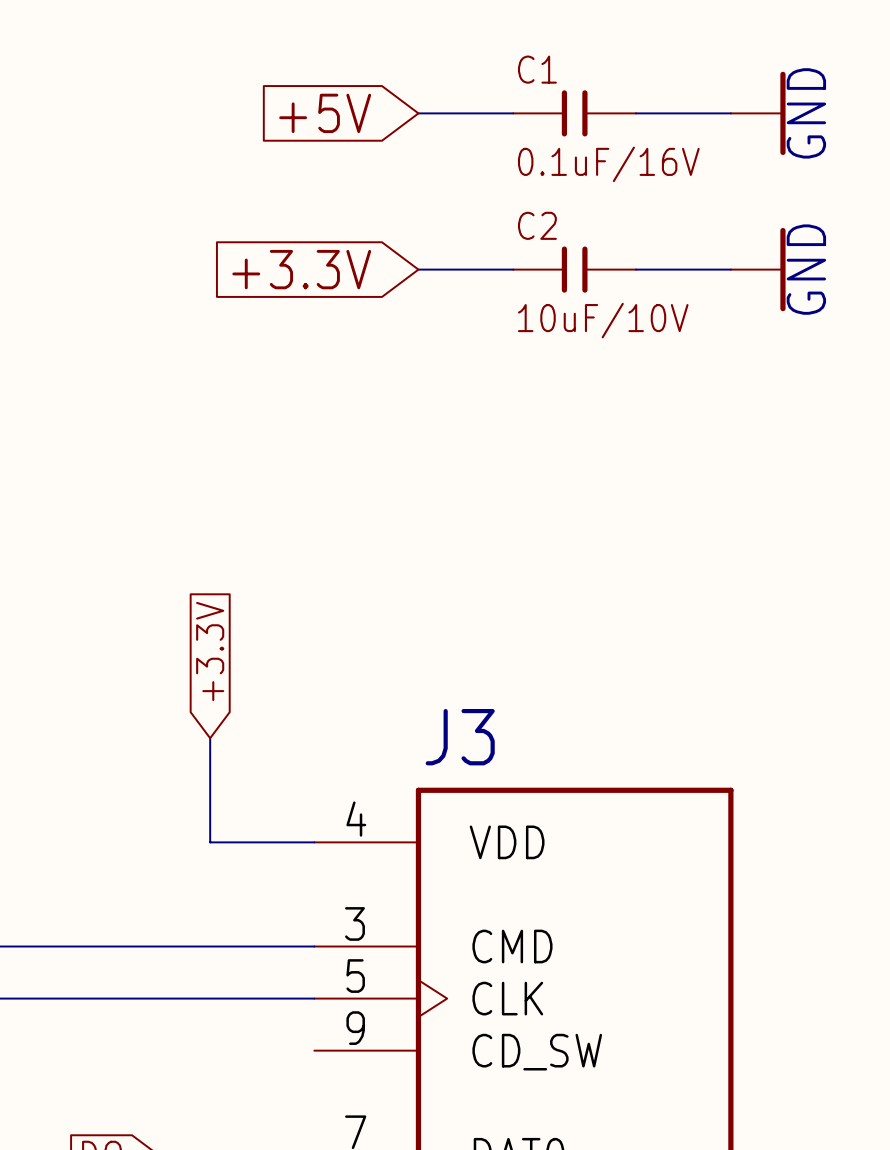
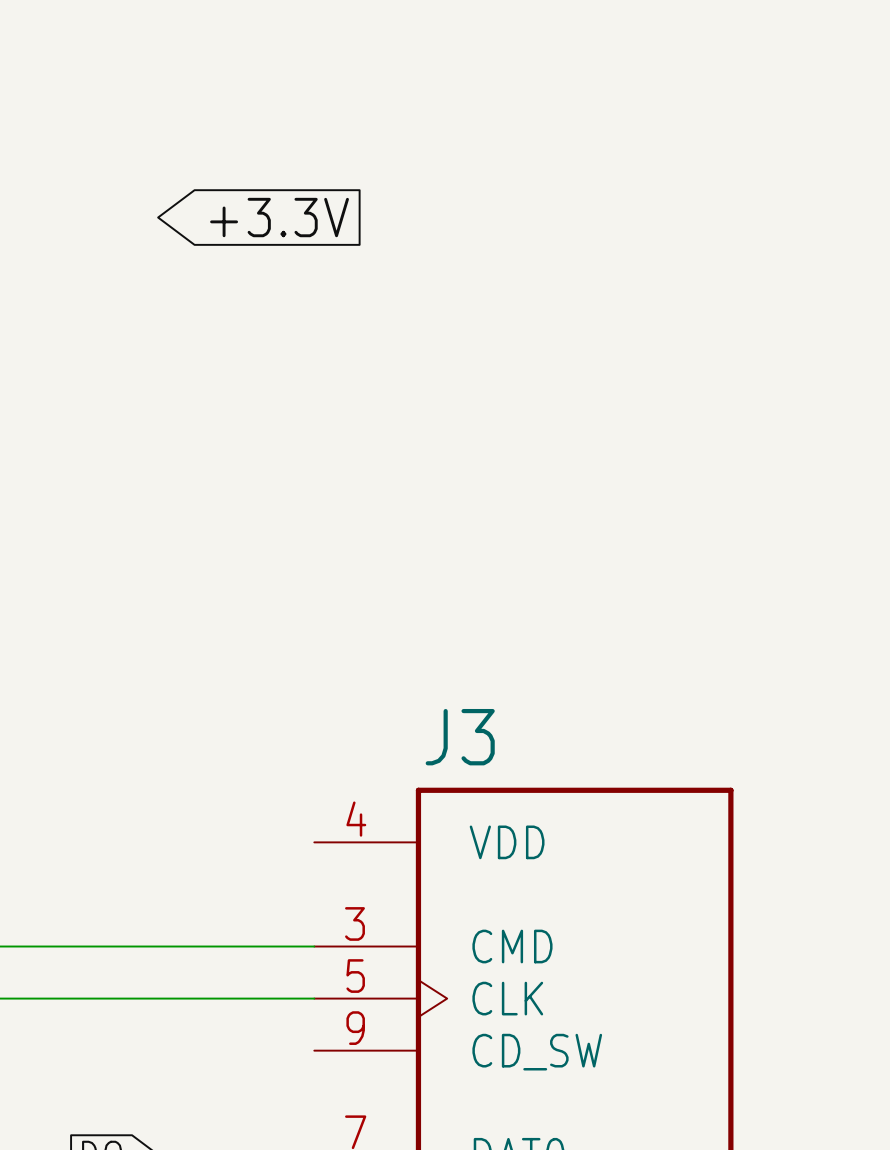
global label: +5V (325, 113) -> none
wire: (418, 113) (513, 113) -> none
C1: 0.1uF/16V (574, 113) -> none
wire: (636, 113) (730, 113) -> none
power symbol: GND (758, 113) -> none
global label rotation: 0° (301, 269) -> 180° (279, 217)
wire: (418, 269) (513, 269) -> none
C2: 10uF/10V (574, 269) -> none
wire: (636, 269) (730, 269) -> none
power symbol: GND (758, 269) -> none
global label: +3.3V (210, 651) -> none
wire: (210, 738) (210, 842) (314, 842) -> none

